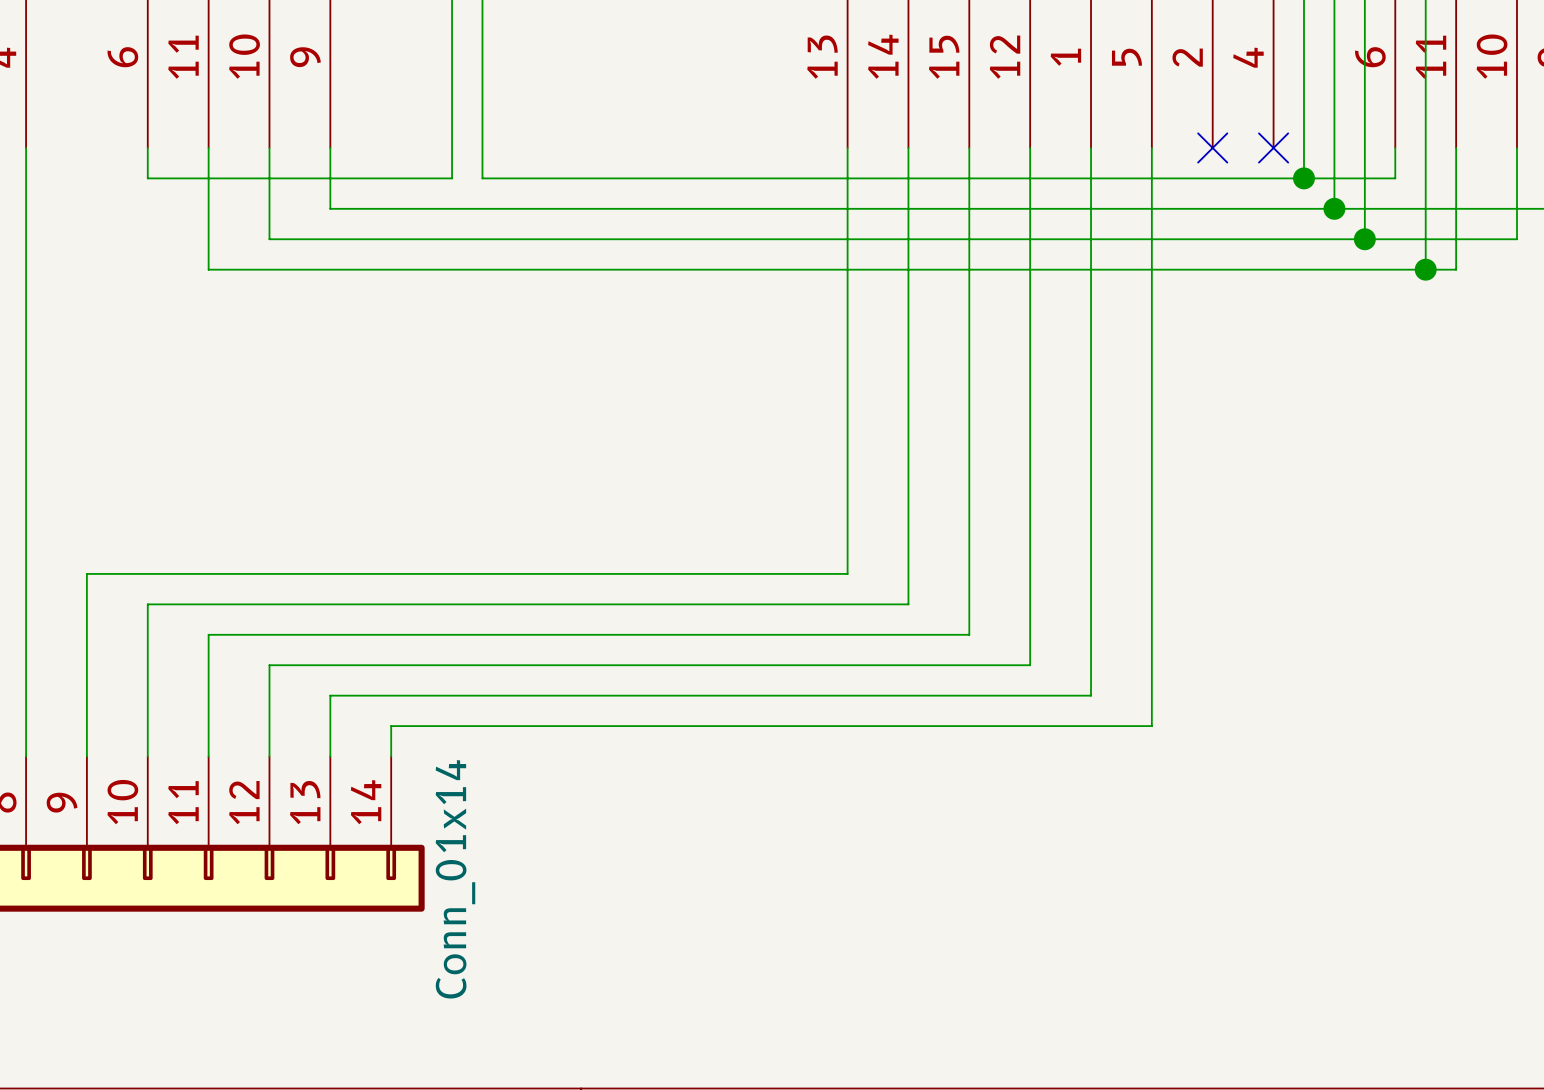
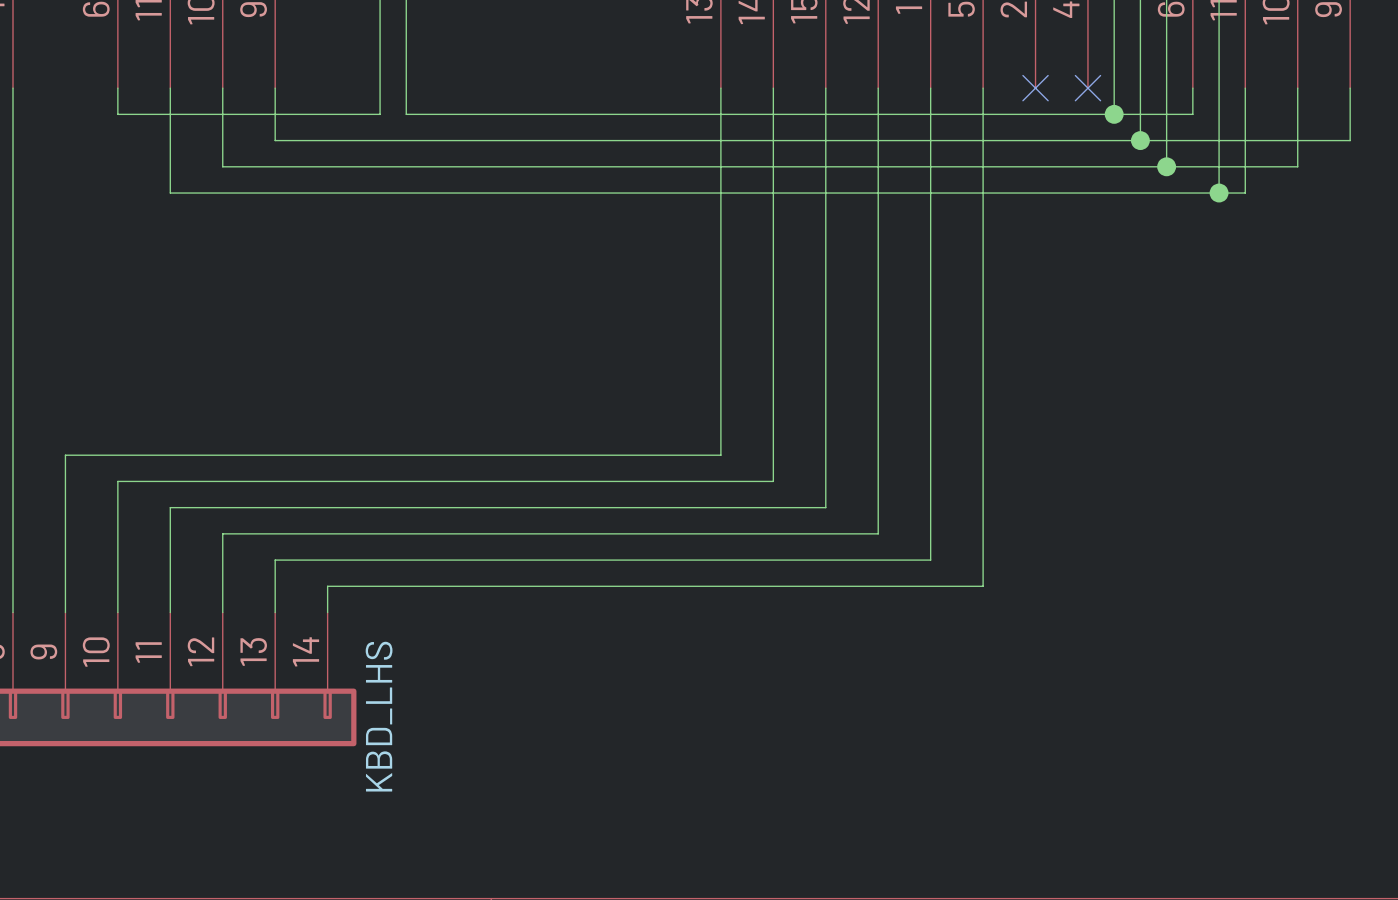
part value: Conn_01x14 (455, 879) -> KBD_LHS (379, 716)

